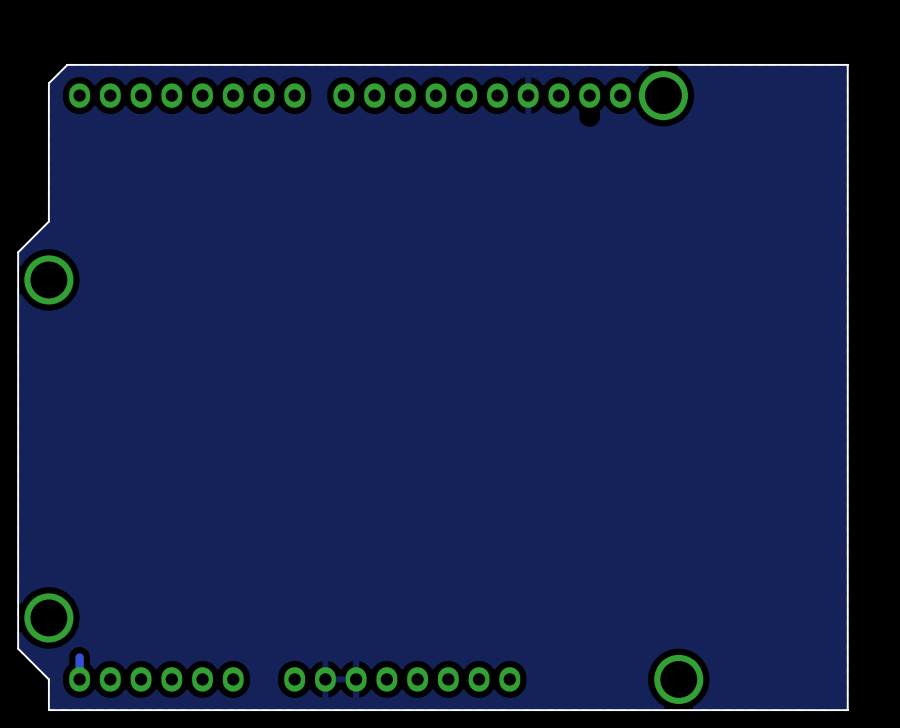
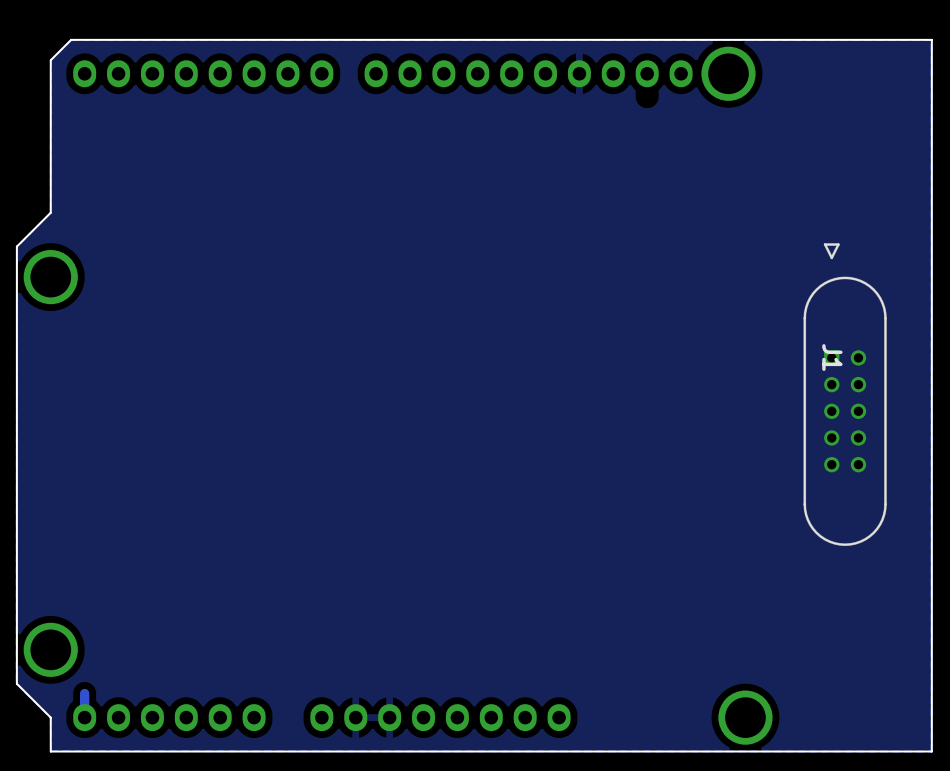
J1: none -> (845, 394)

